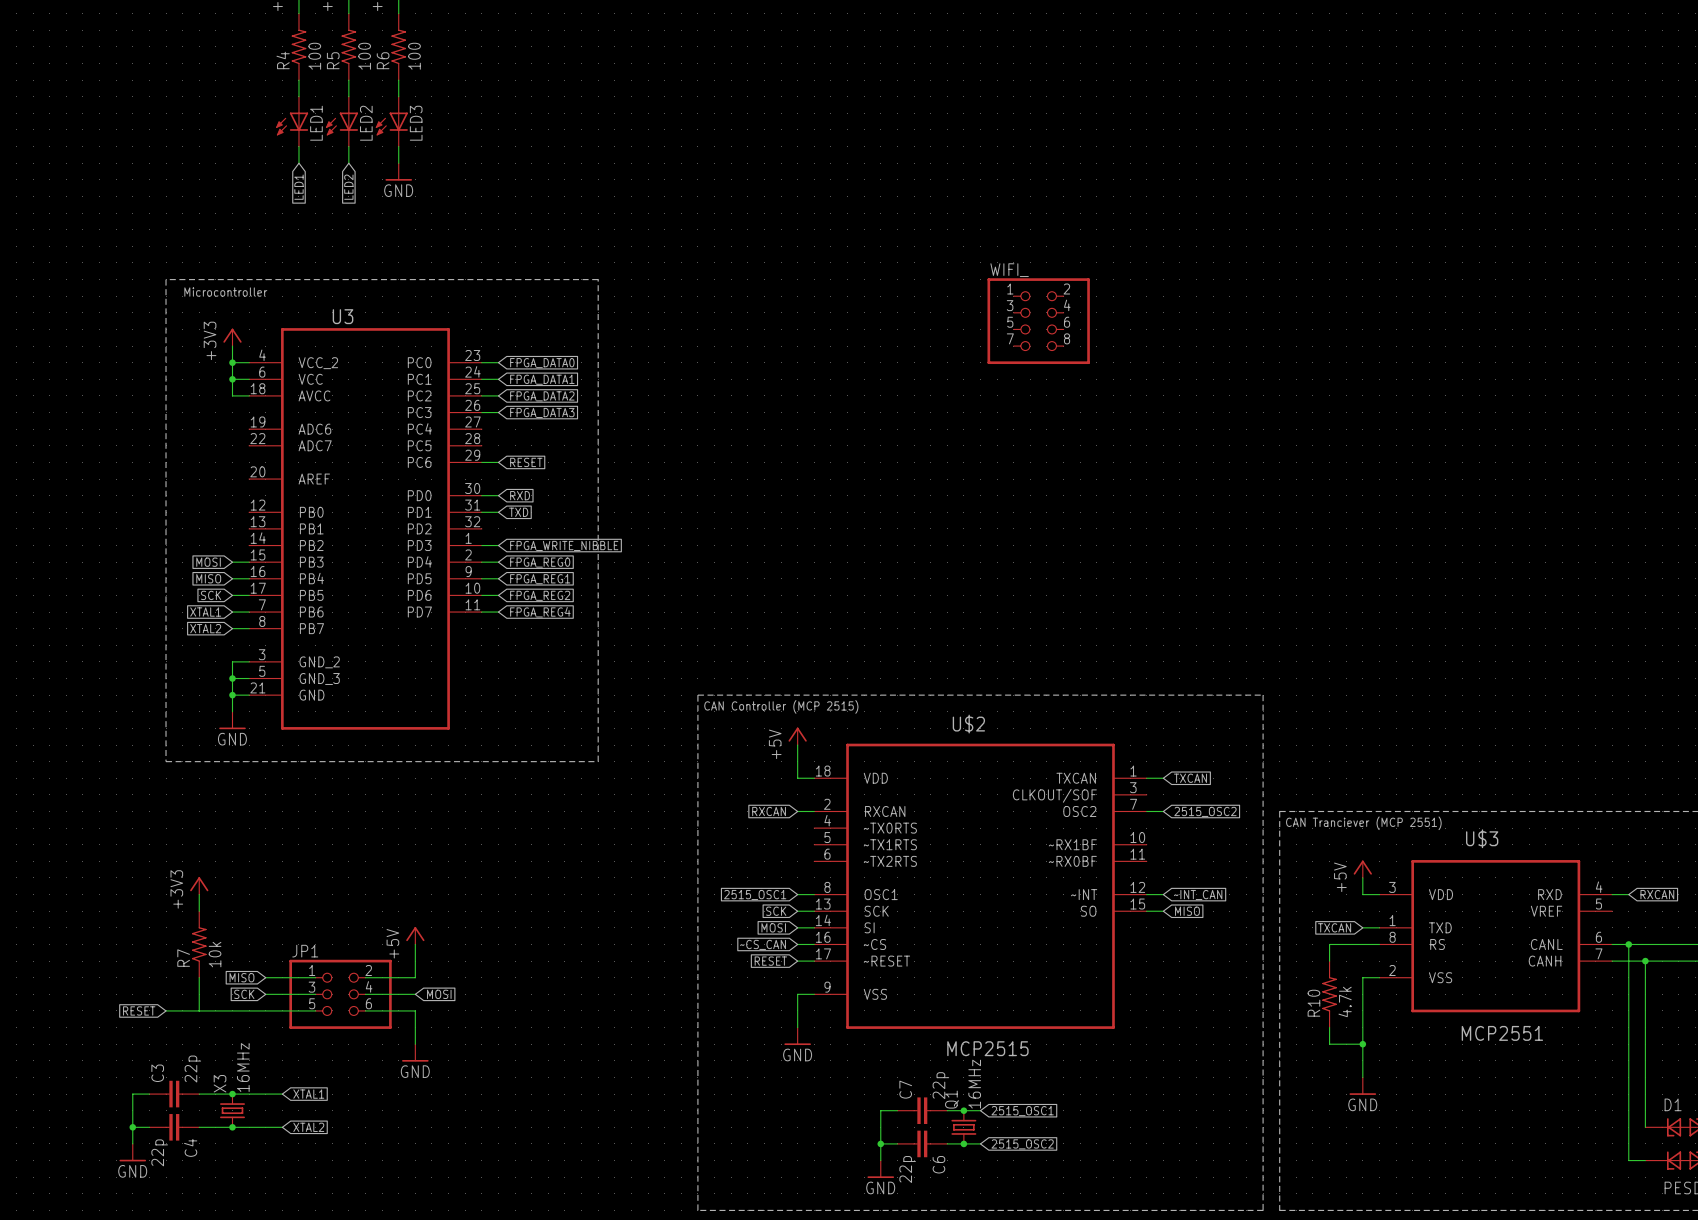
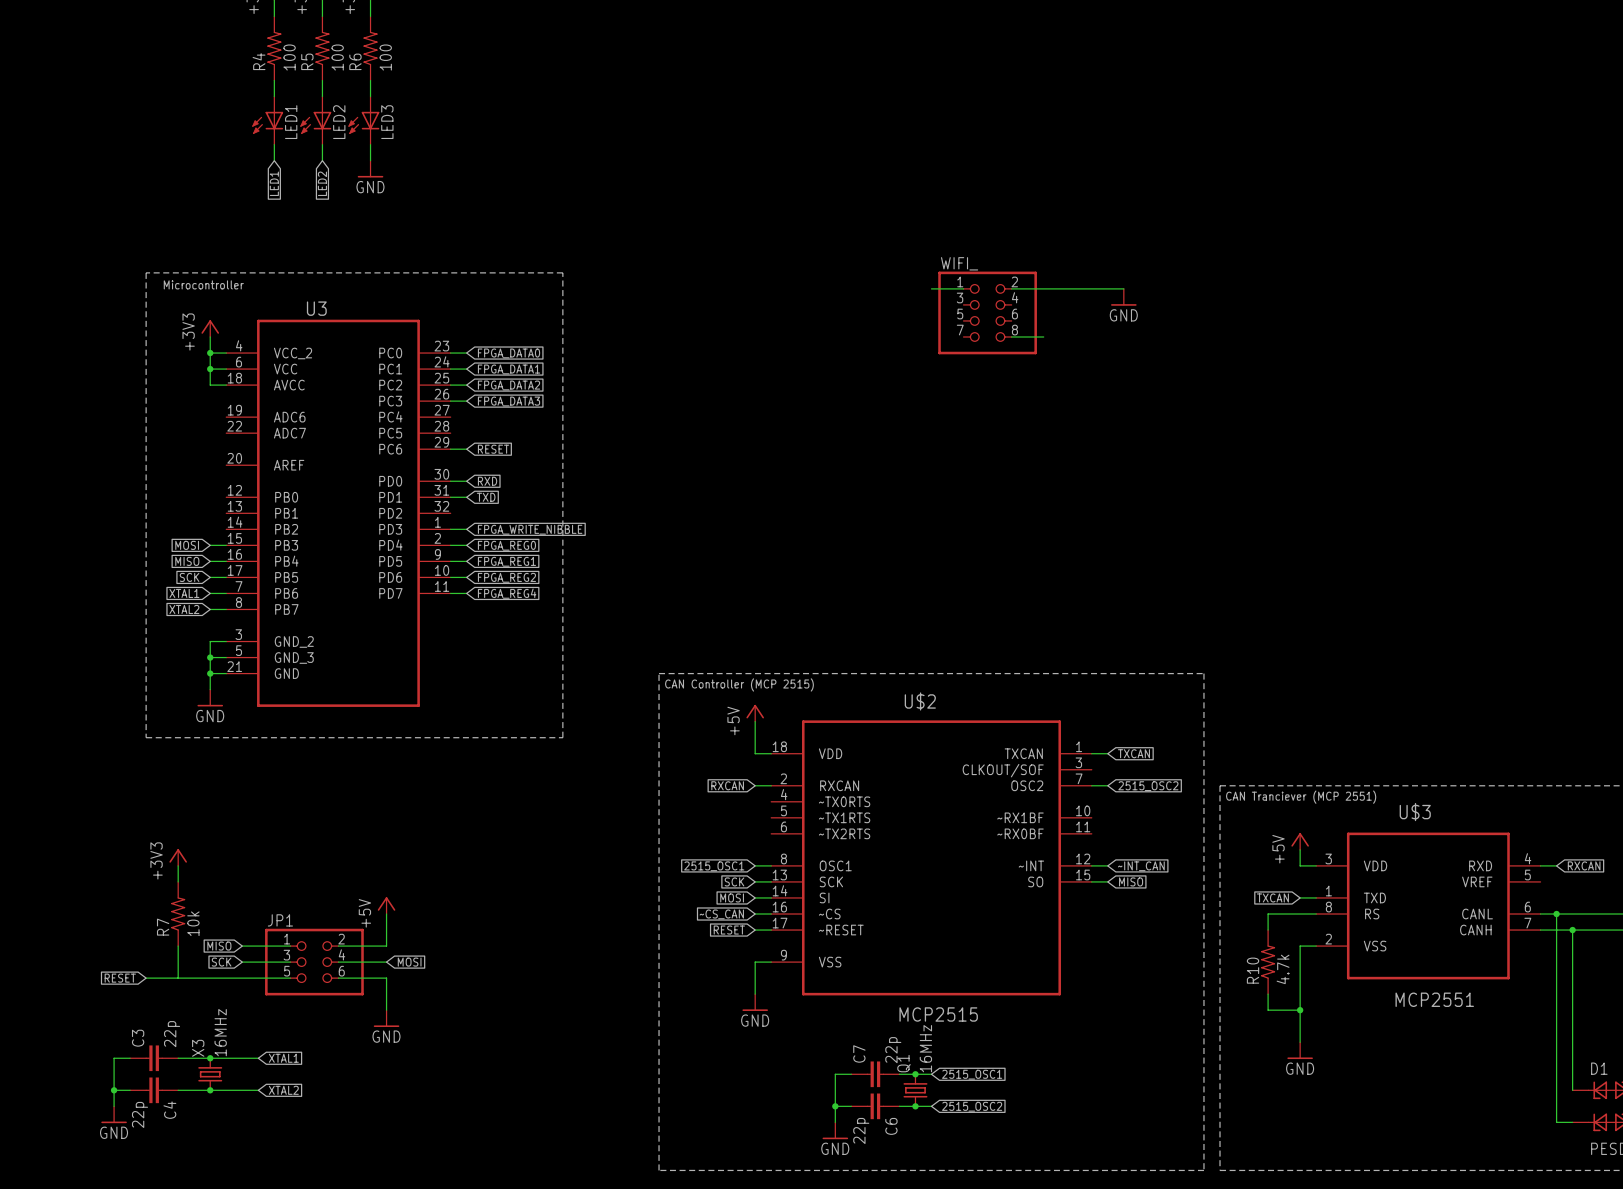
wire: none -> (931, 288) (963, 288)
wire: none -> (1011, 288) (1123, 288)
power symbol: none -> GND (1123, 297)
wire: none -> (1011, 337) (1043, 337)

